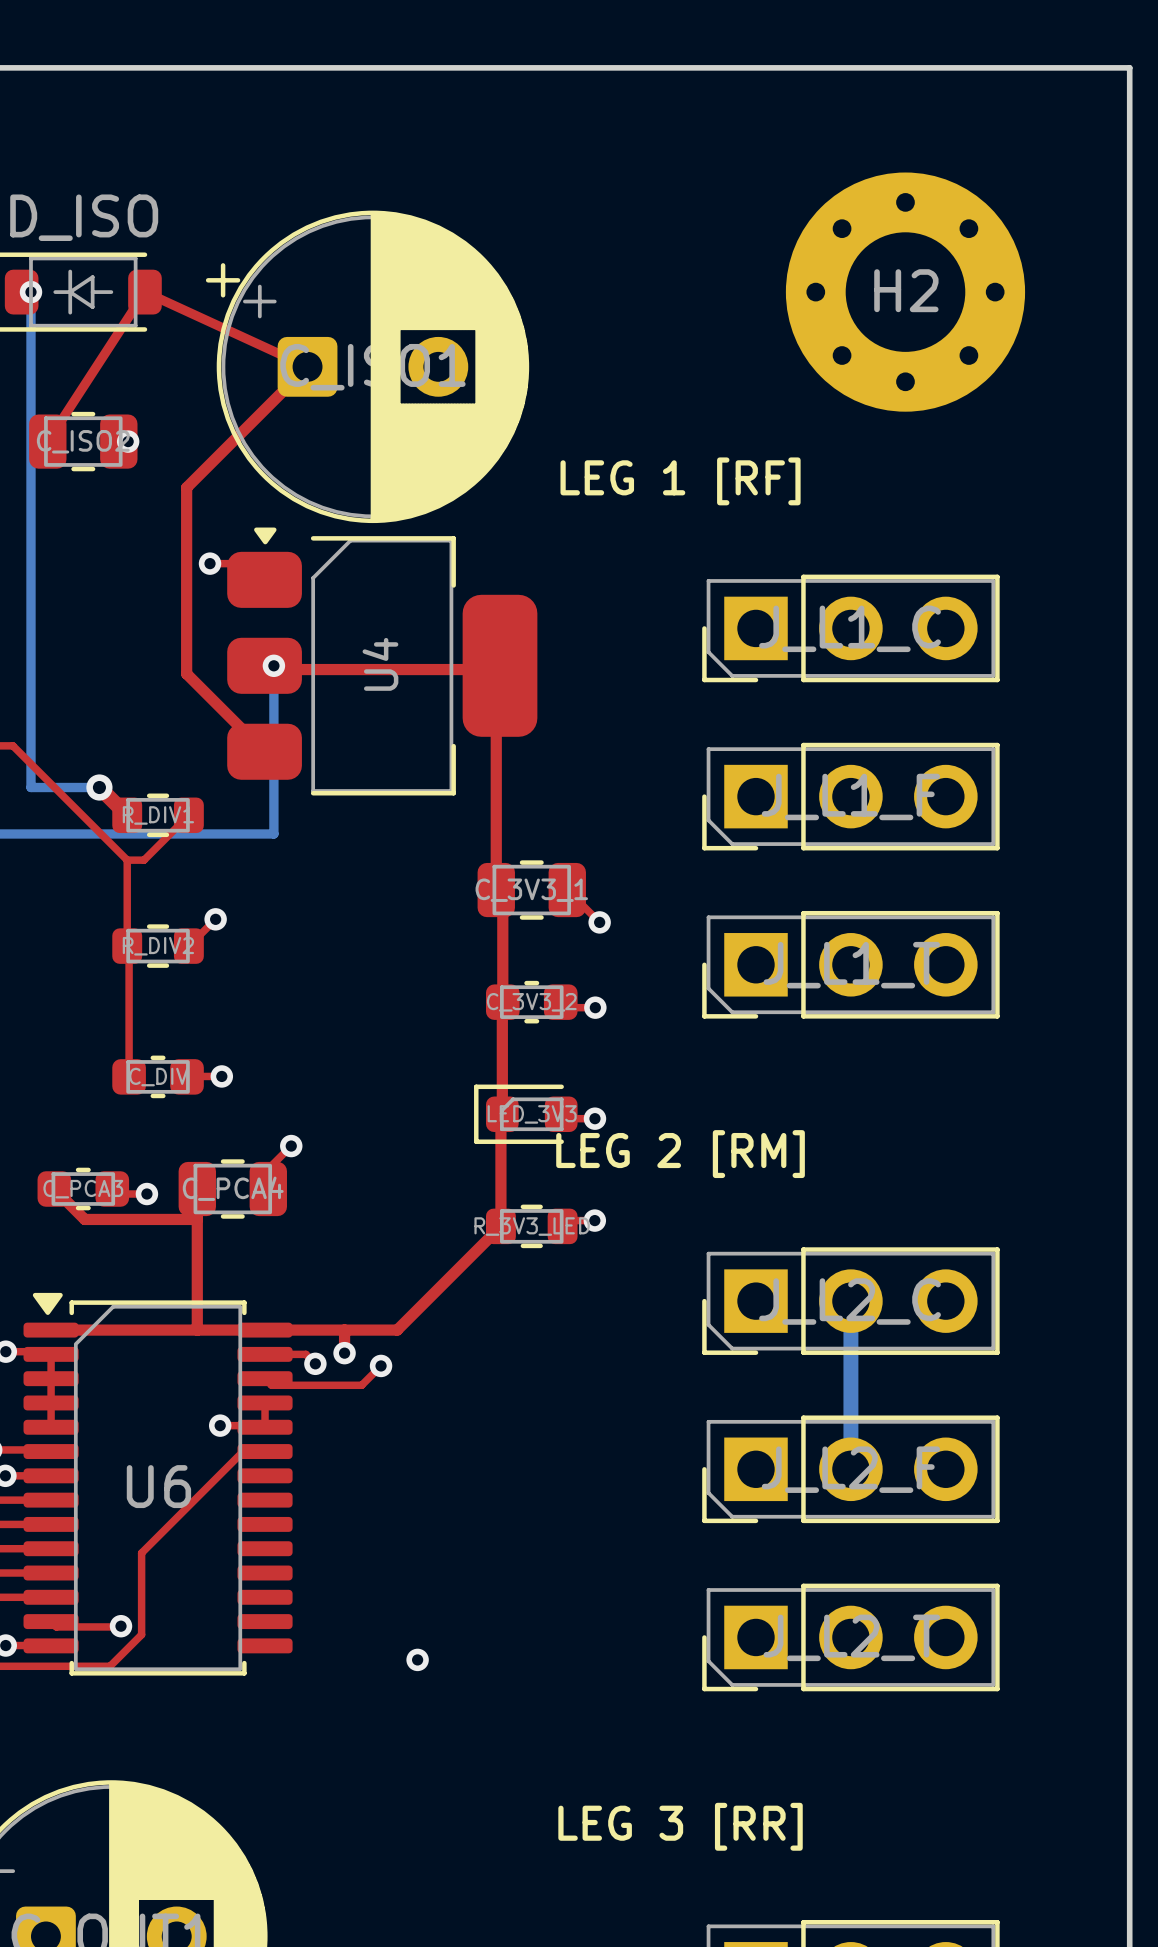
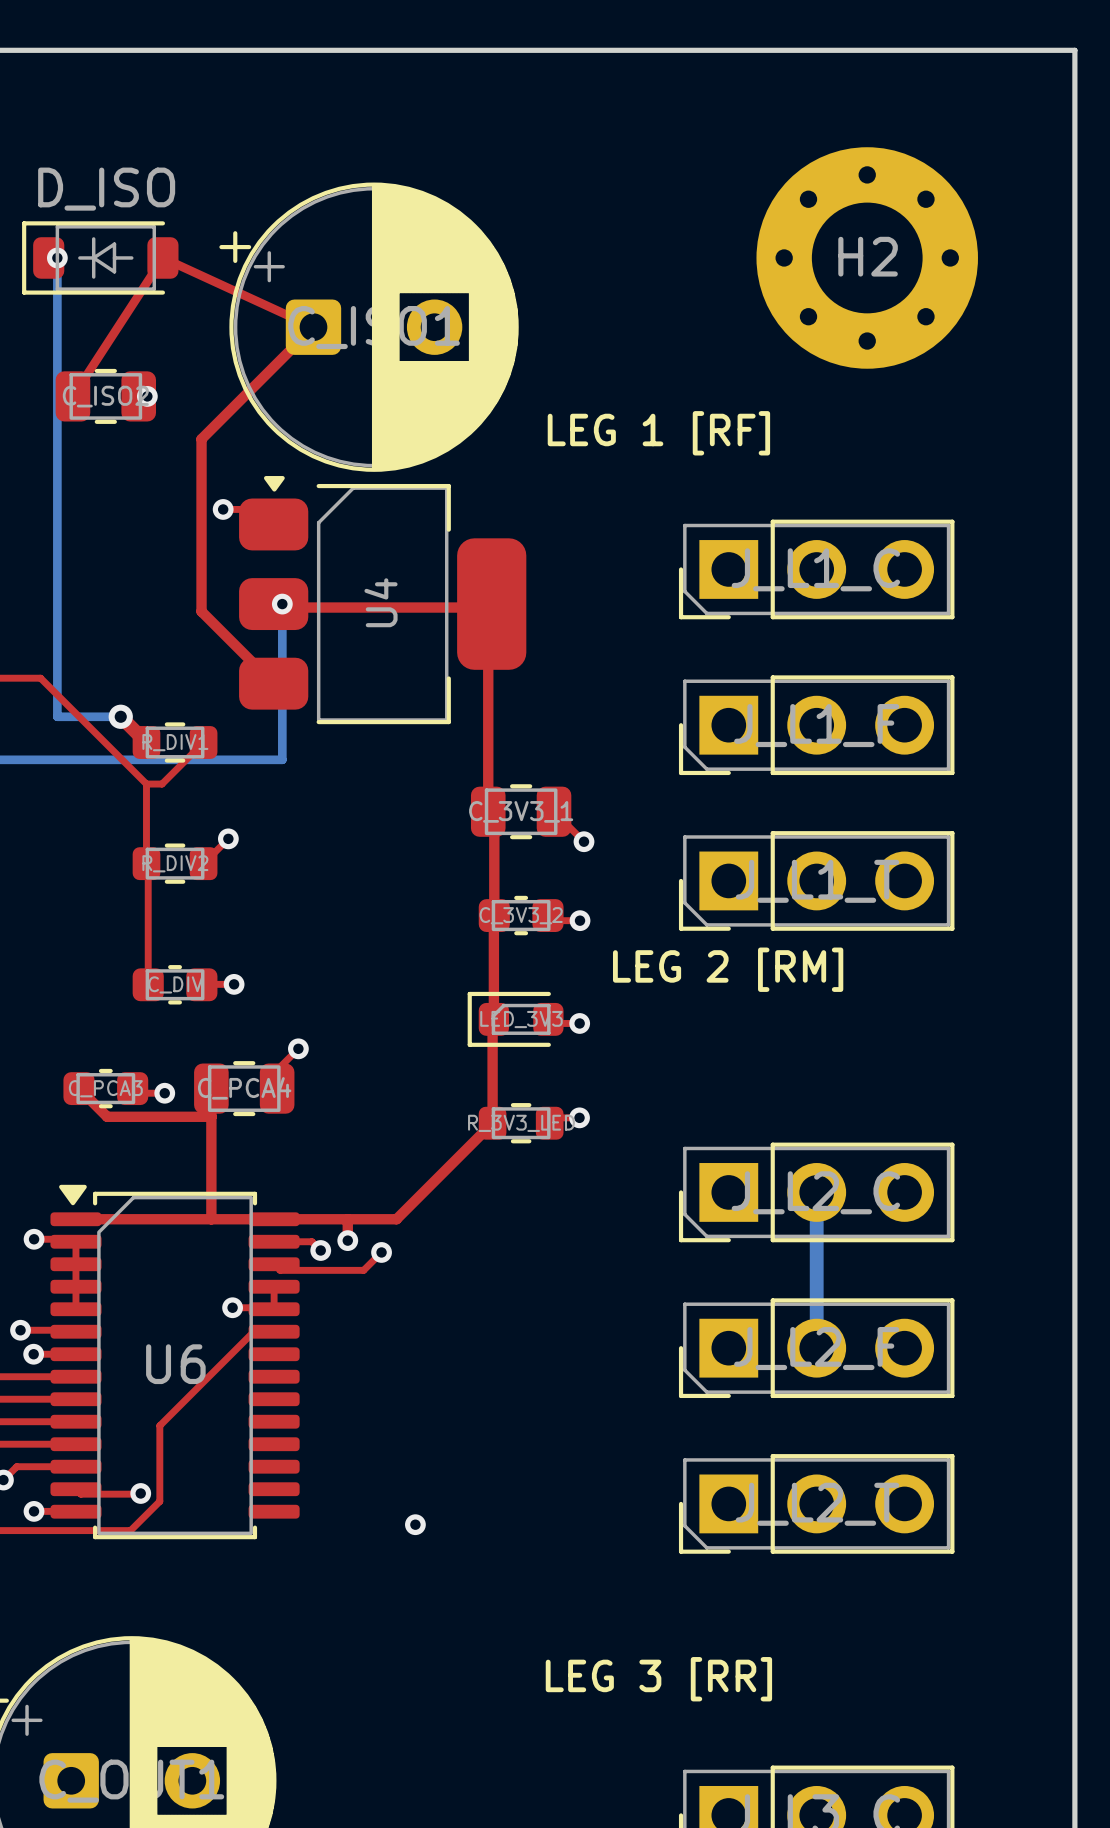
text position: LEG 2 [RM] (680, 1154) -> LEG 2 [RM] (728, 969)

